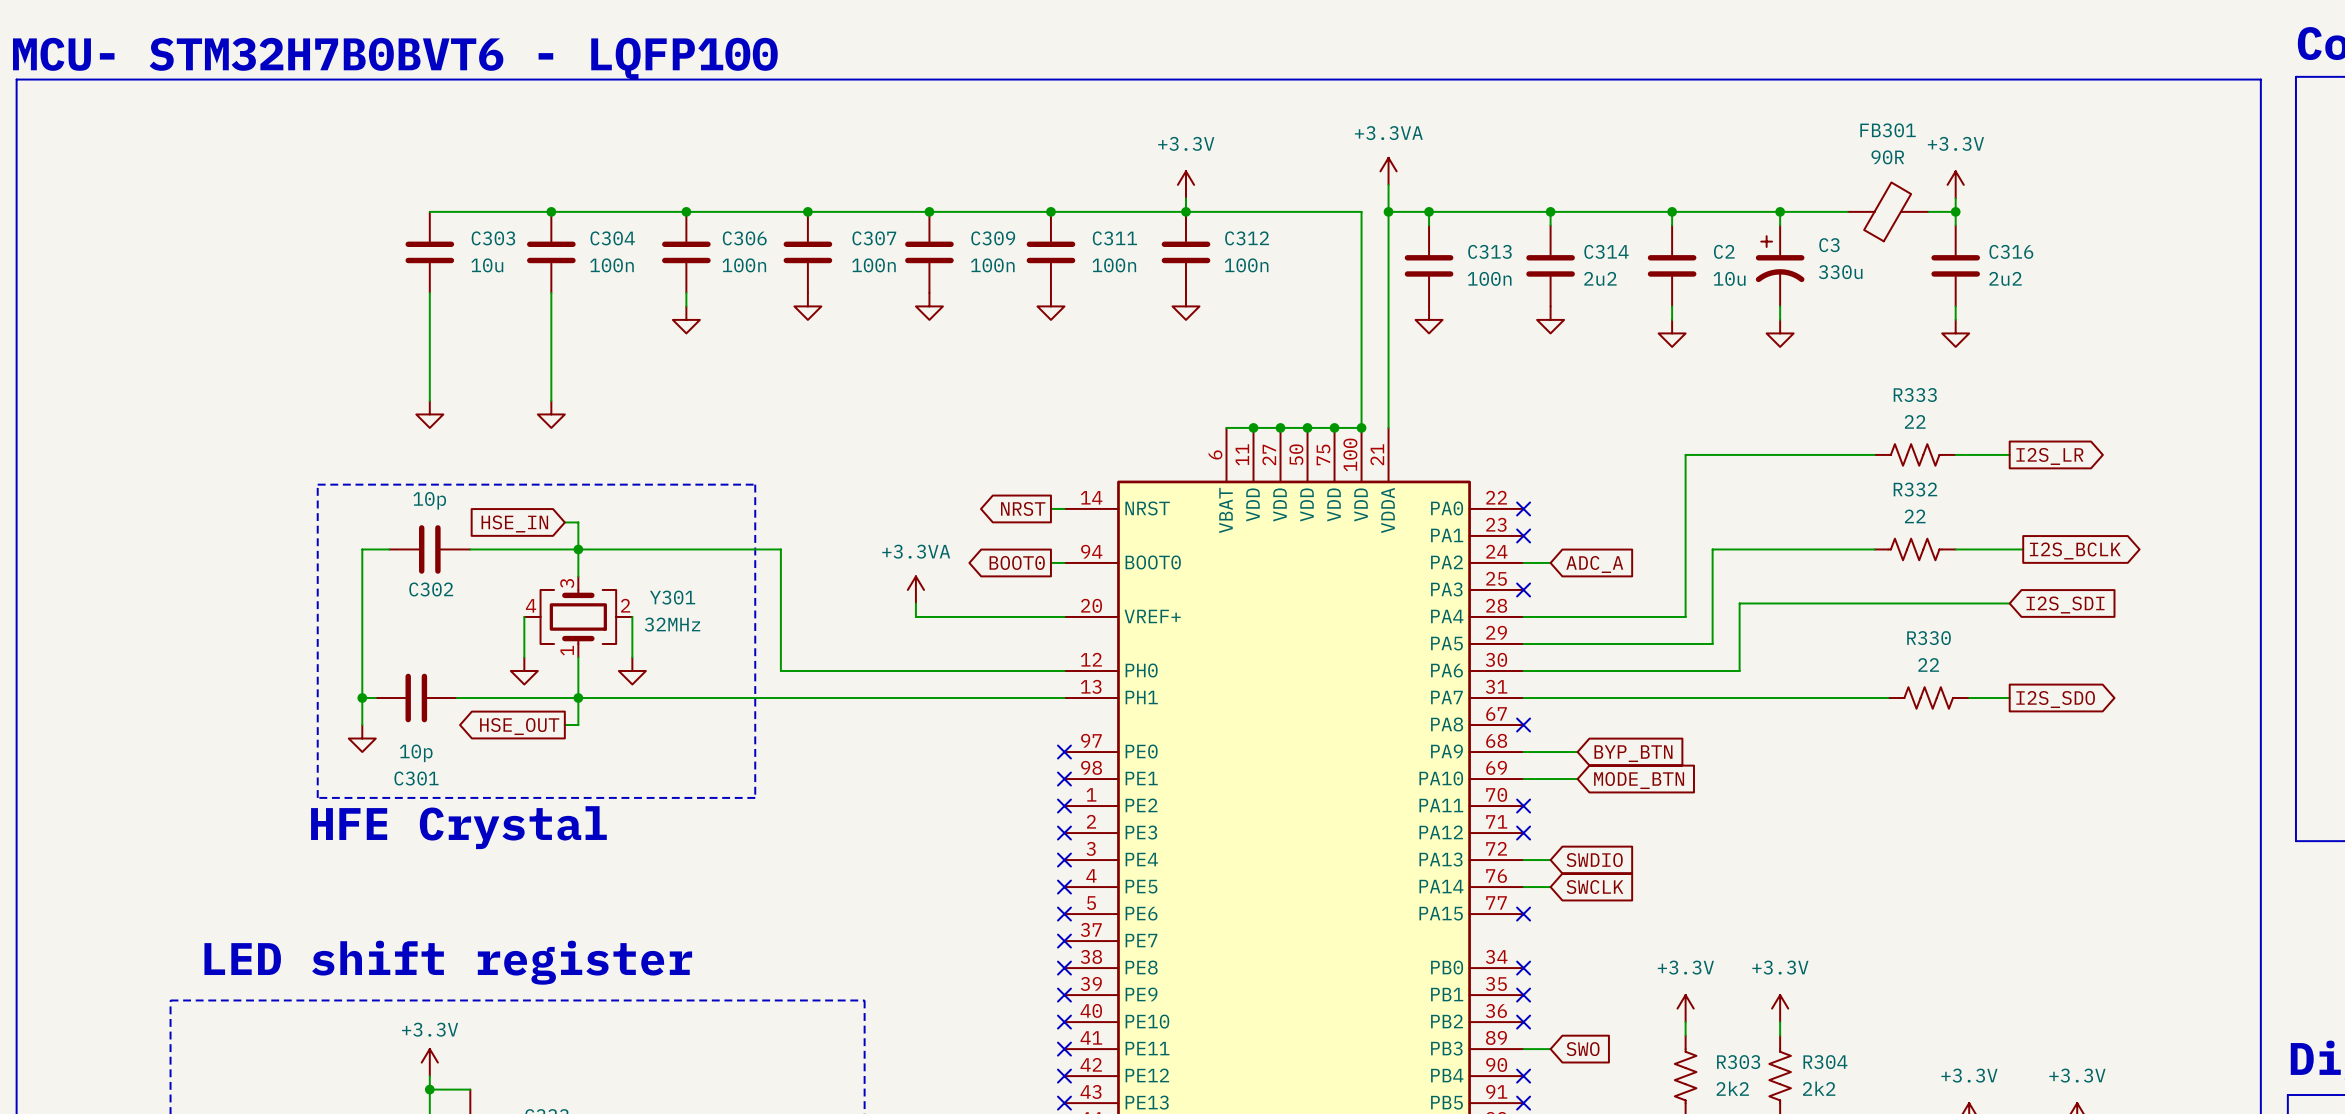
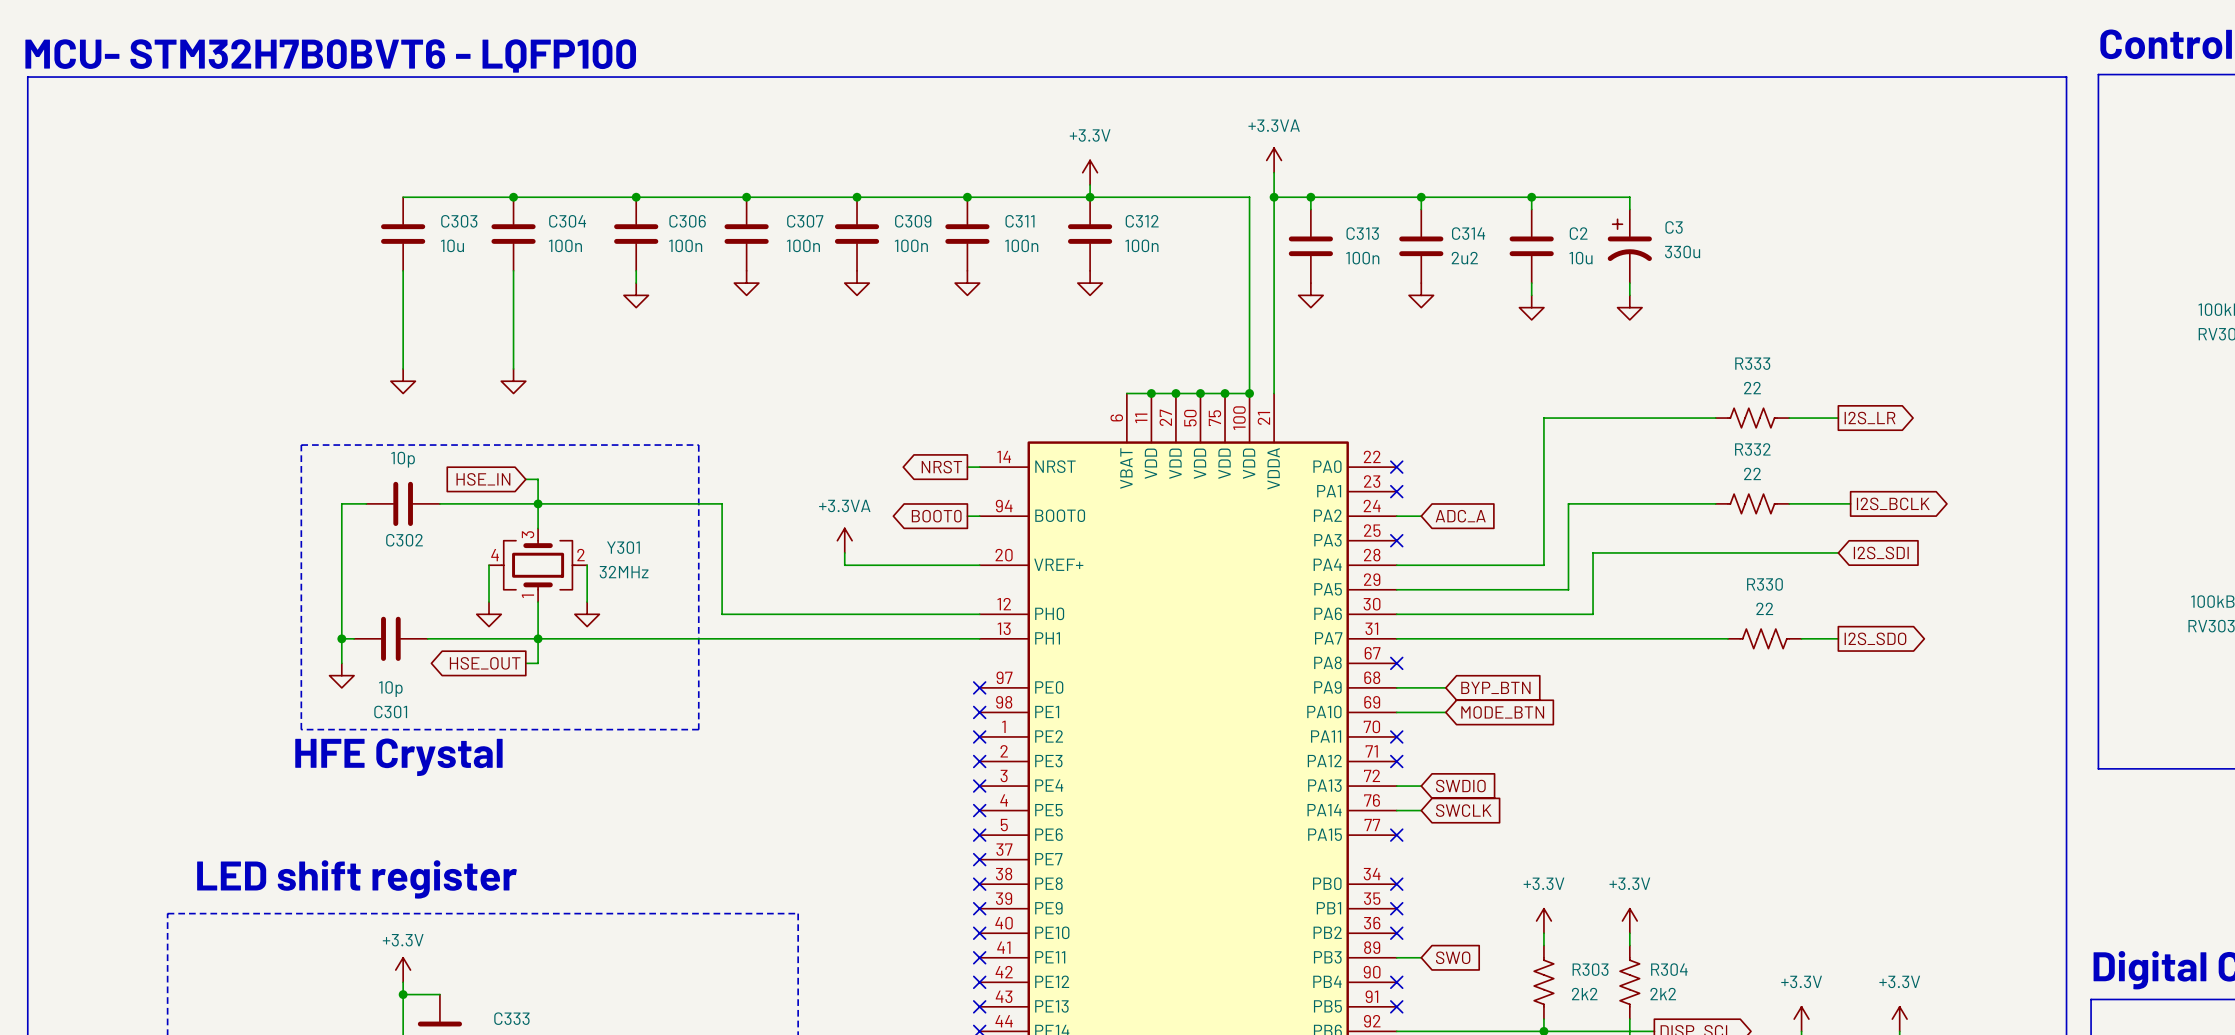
power symbol: +3.3V (1955, 184) -> none
wire: (1955, 198) (1955, 225) -> none
wire: (1780, 211) (1847, 211) -> none
junction: (1780, 211) -> none
FB301: 90R (1888, 211) -> none
wire: (1928, 211) (1955, 211) -> none
junction: (1955, 211) -> none
C316: 2u2 (1955, 265) -> none
wire: (1955, 306) (1955, 319) -> none
power symbol: (1955, 333) -> none

